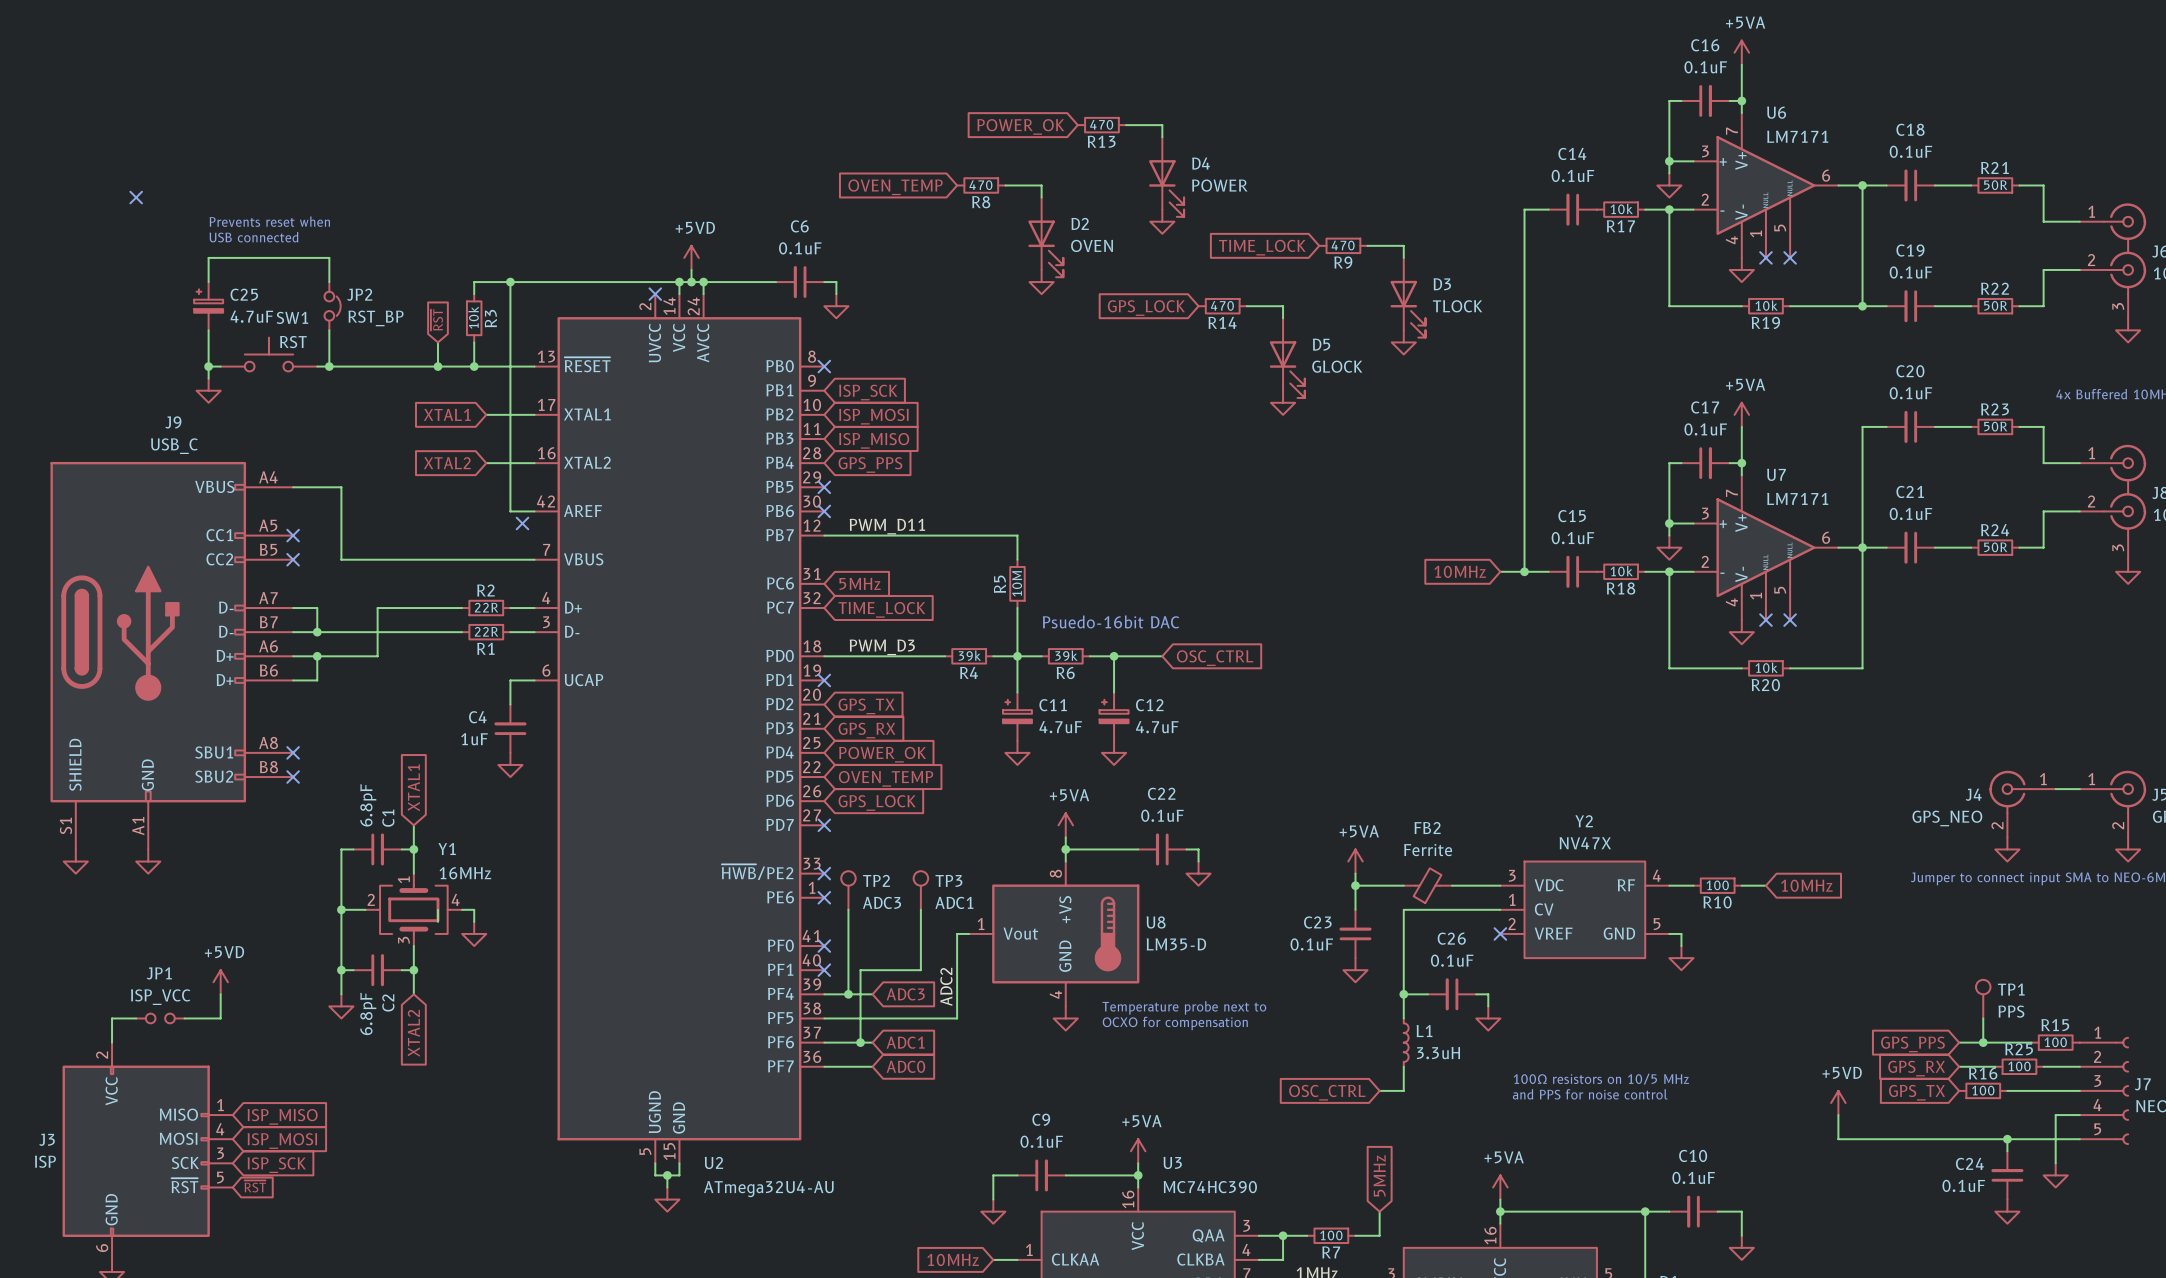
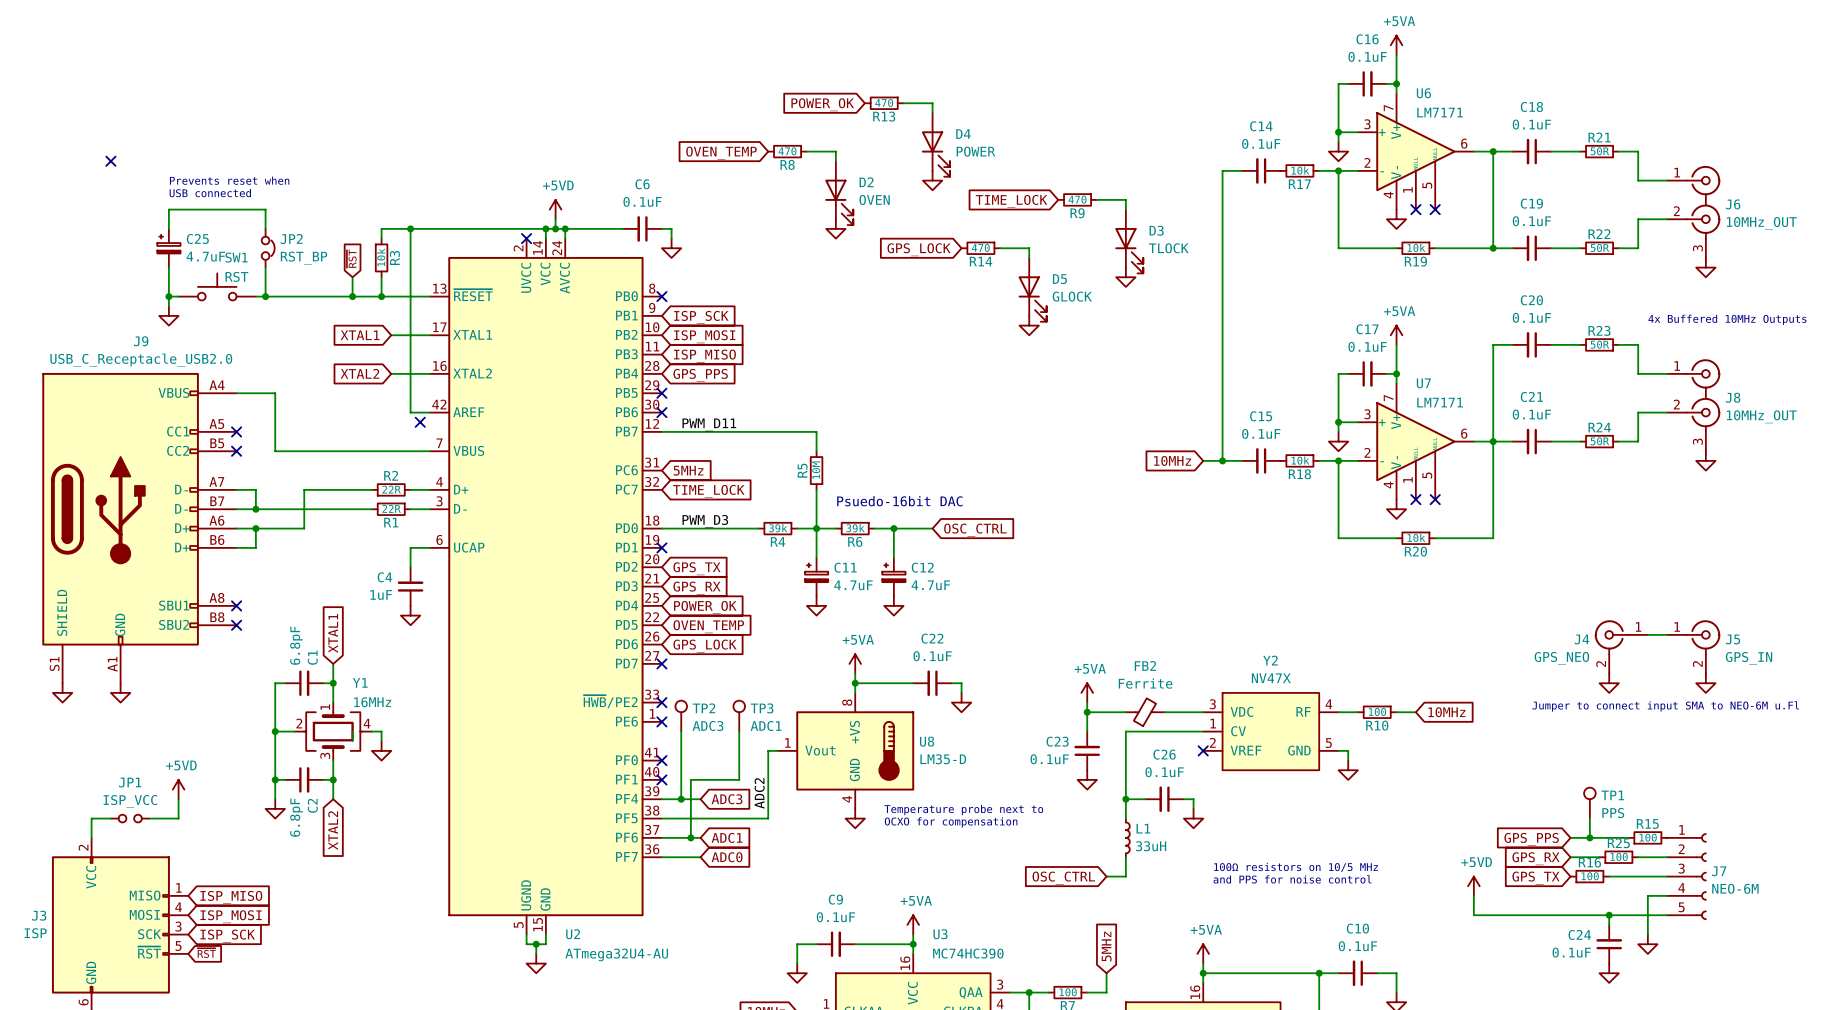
J9 value: USB_C (174, 446) -> USB_C_Receptacle_USB2.0 (141, 360)
L1 value: 3.3uH (1438, 1053) -> 33uH (1151, 846)

